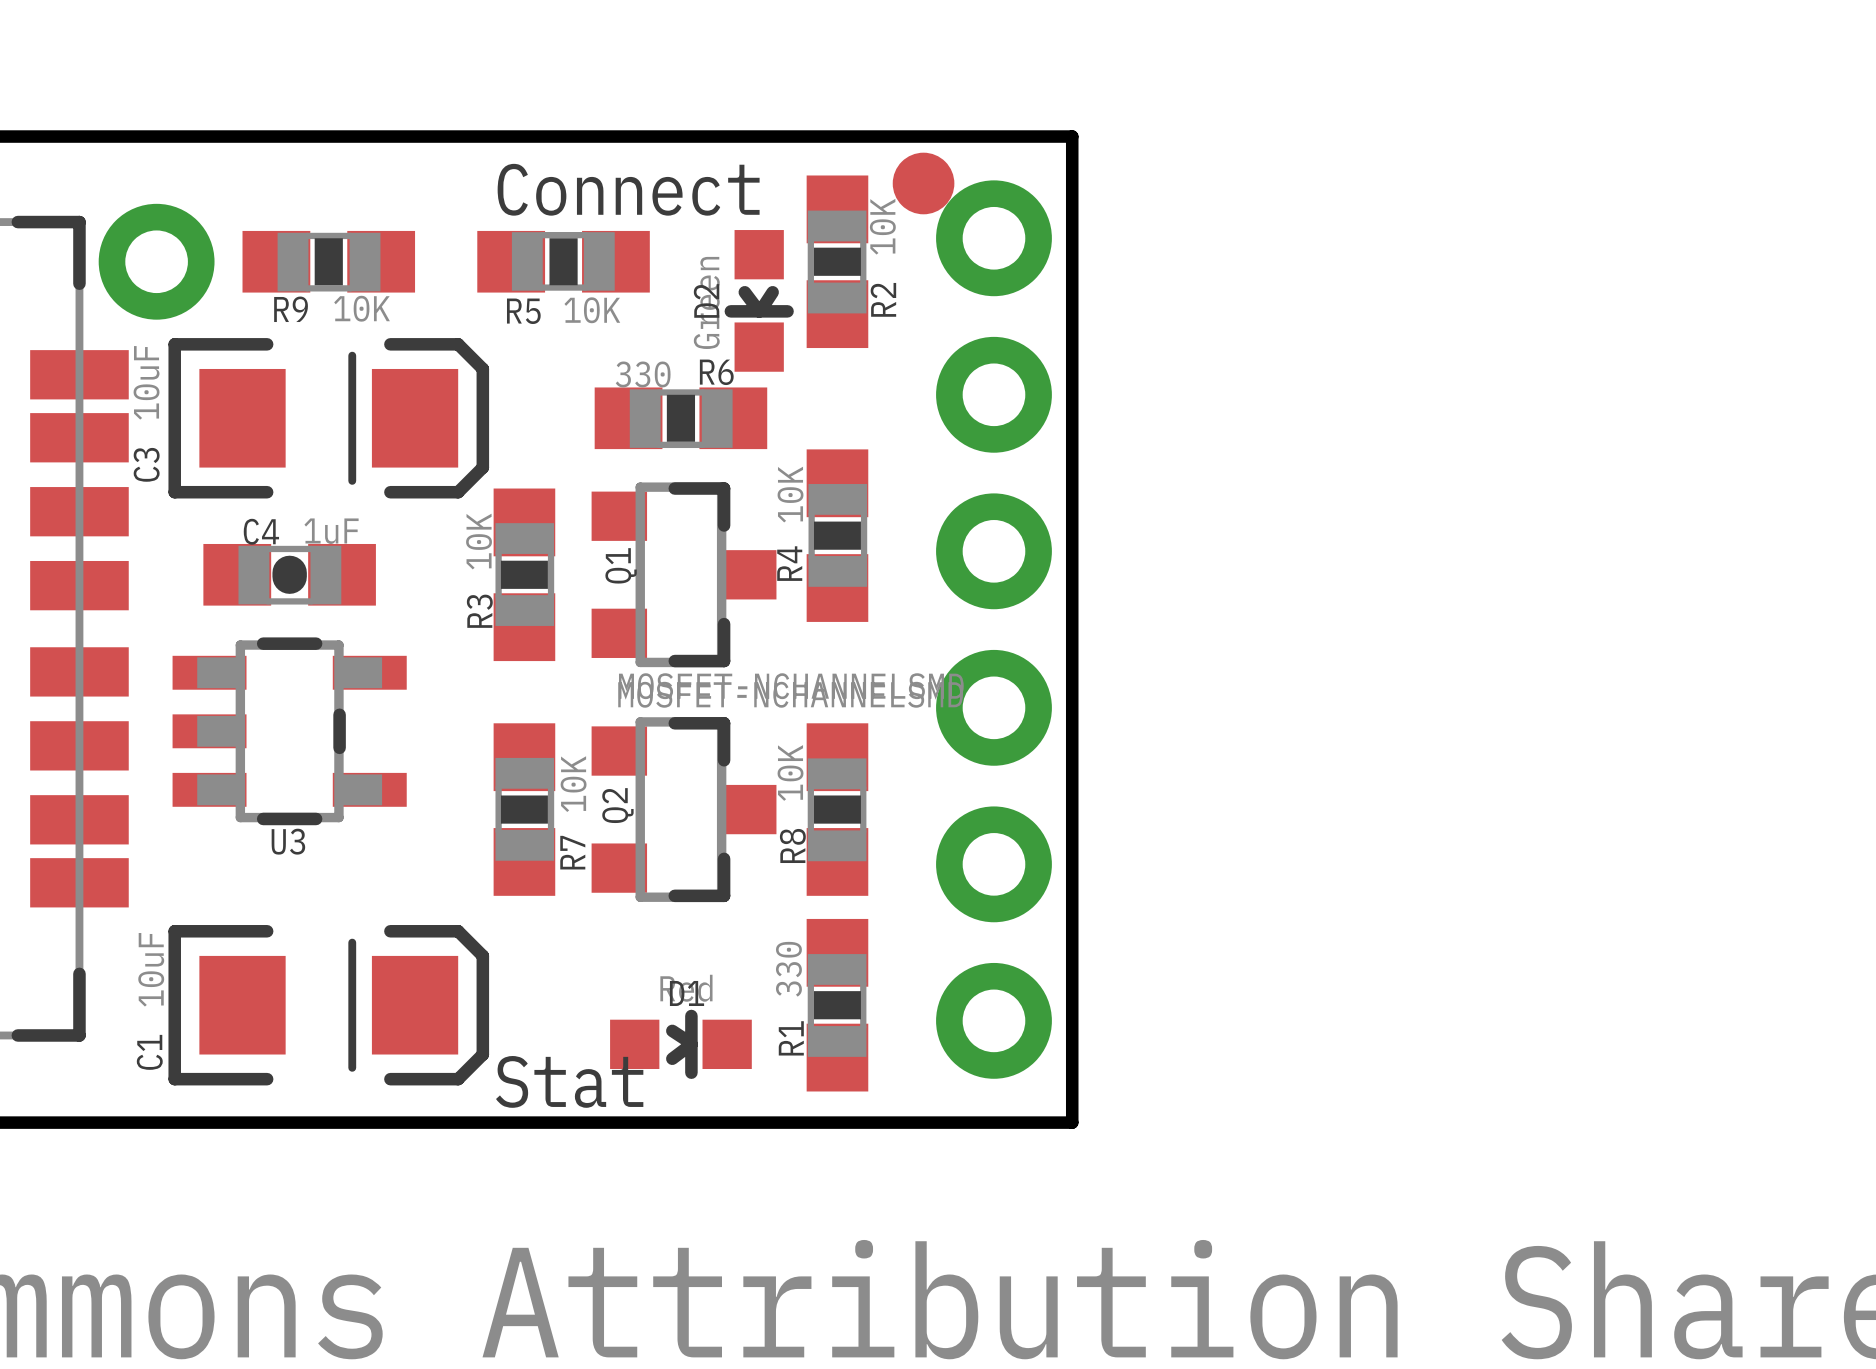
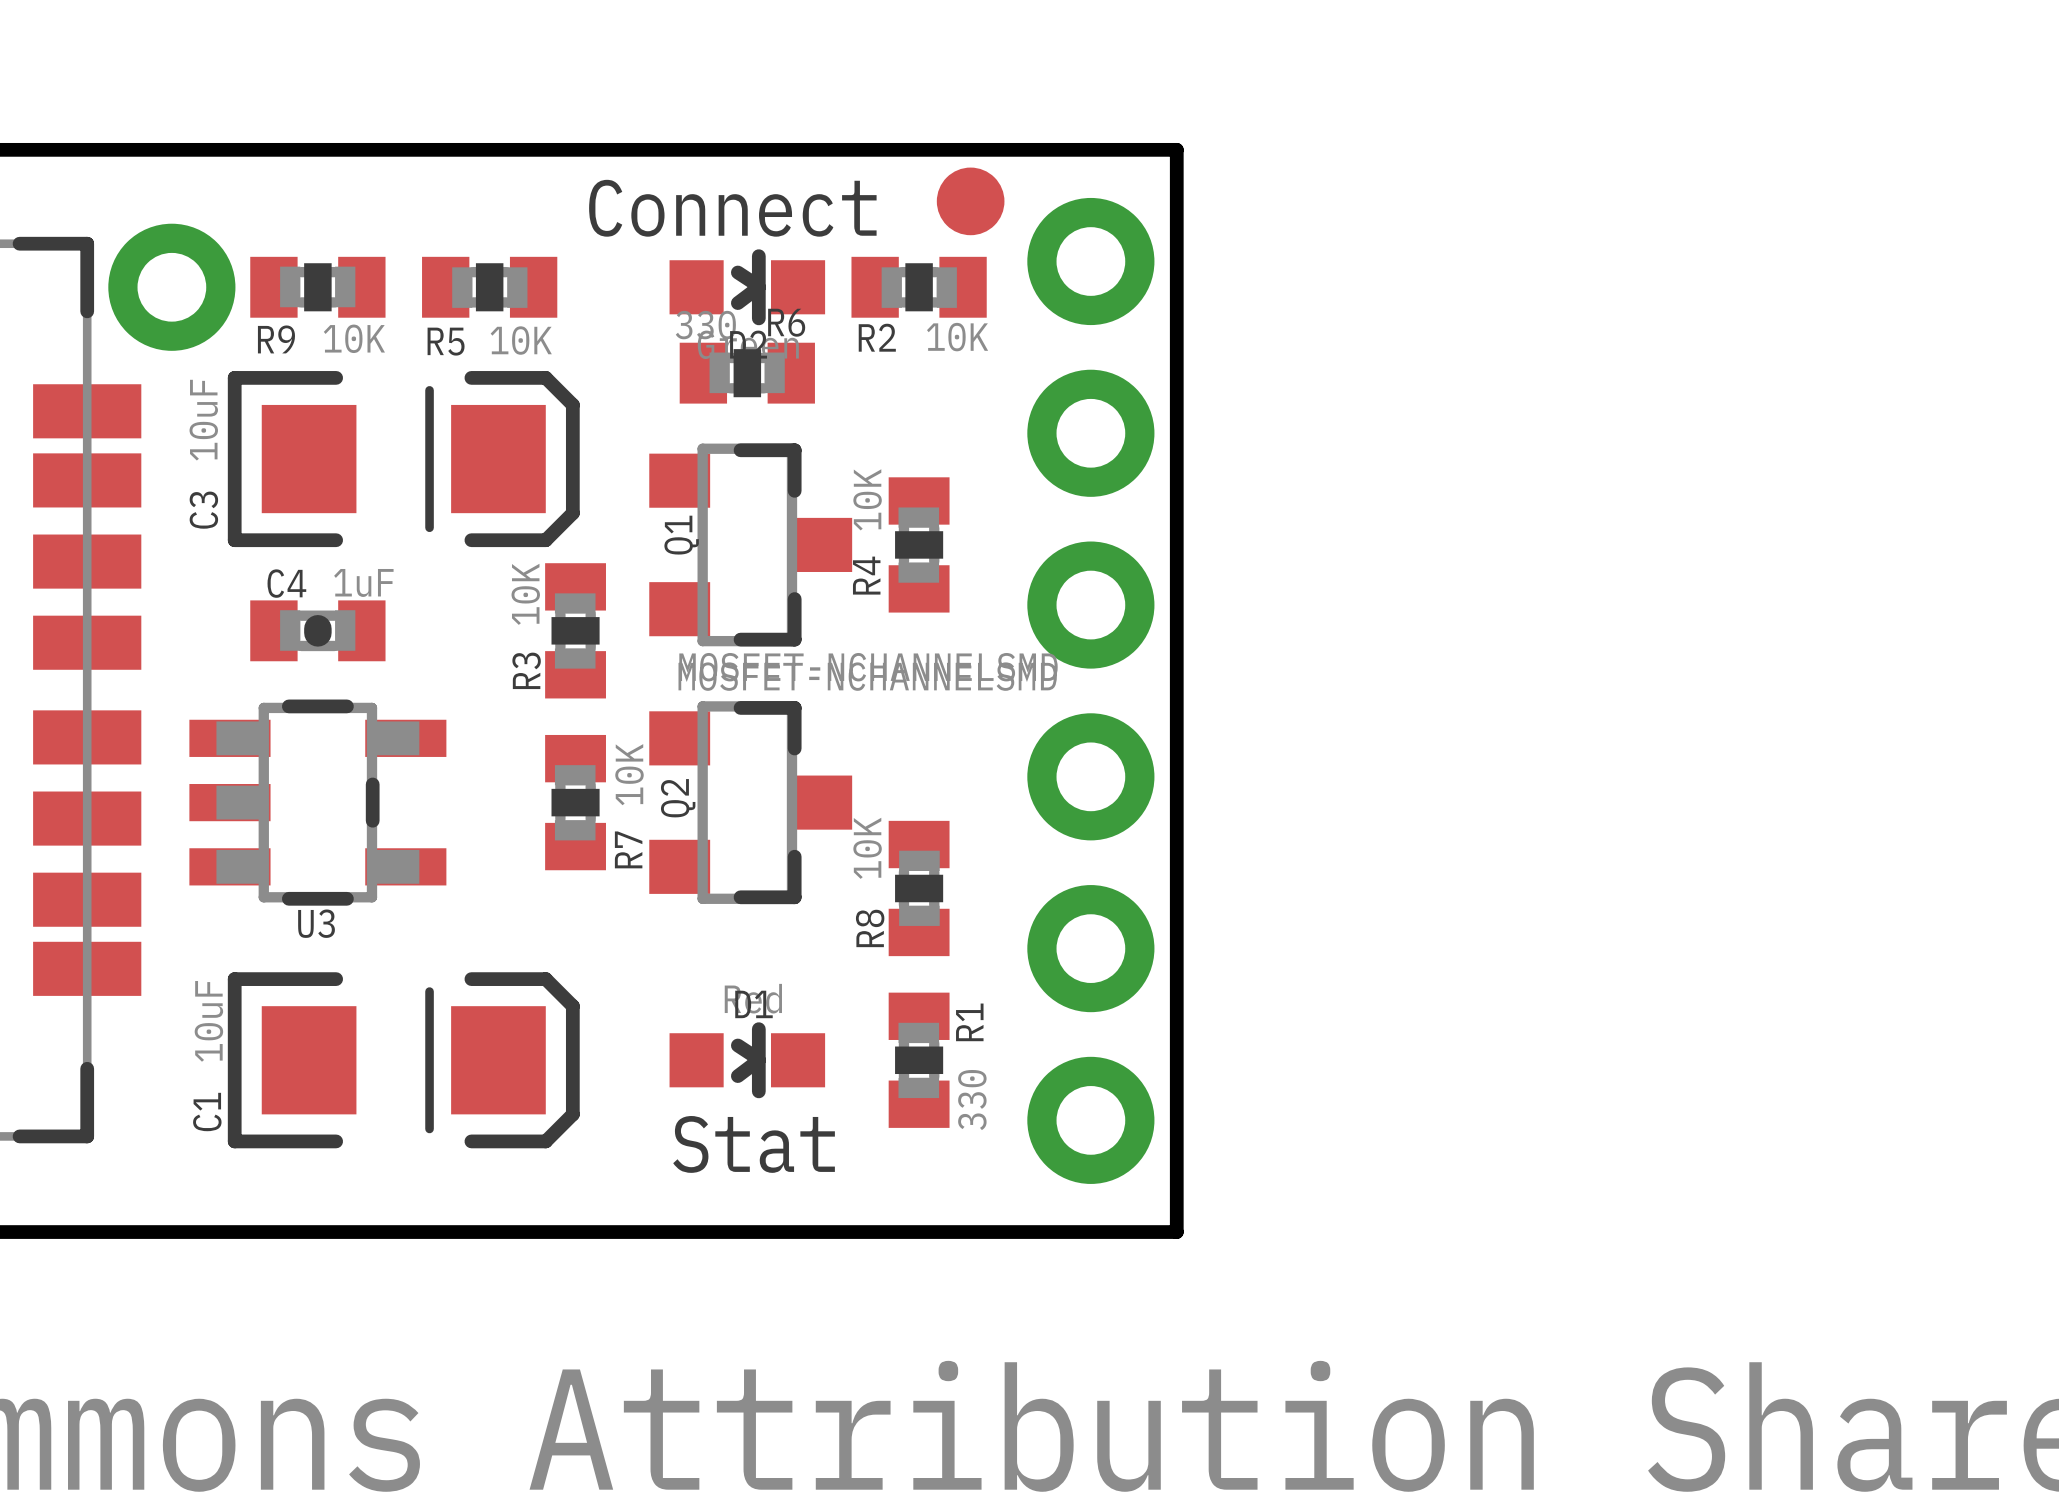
R2 footprint: [806, 175, 869, 349] -> [851, 256, 987, 318]
part position: (923, 183) -> (970, 201)
text position: Connect (628, 189) -> Connect (732, 208)
R2 value rotation: 0° (882, 226) -> 90° clockwise (957, 337)
R2 value position: 10K (882, 226) -> 10K (957, 337)
R9 footprint: [242, 230, 416, 293] -> [250, 256, 386, 318]
R5 footprint: [477, 230, 650, 293] -> [422, 256, 558, 318]
R2 name rotation: 0° (883, 299) -> 90° clockwise (877, 337)
R2 name position: R2 (883, 299) -> R2 (877, 337)
D2 rotation: 0° (759, 300) -> 90° counterclockwise (747, 287)
D2 position: (759, 300) -> (747, 287)
R6 footprint: [594, 387, 768, 450] -> [679, 342, 815, 404]
C3 position: (328, 418) -> (403, 459)
R4 footprint: [806, 449, 869, 622] -> [888, 477, 950, 613]
R3 footprint: [493, 488, 556, 662] -> [545, 563, 606, 699]
C4 footprint: [203, 543, 376, 606] -> [250, 600, 386, 662]
Q1 position: (684, 574) -> (750, 544)
R7 footprint: [493, 723, 556, 896] -> [545, 734, 606, 871]
R8 footprint: [806, 723, 869, 896] -> [888, 820, 950, 957]
Q2 position: (684, 809) -> (750, 802)
R1 footprint: [806, 918, 869, 1092] -> [888, 992, 950, 1128]
R1 value position: 330 (788, 969) -> 330 (972, 1100)
C1 position: (328, 1005) -> (403, 1060)
D1 position: (680, 1044) -> (747, 1060)
text position: Stat (569, 1081) -> Stat (754, 1144)

